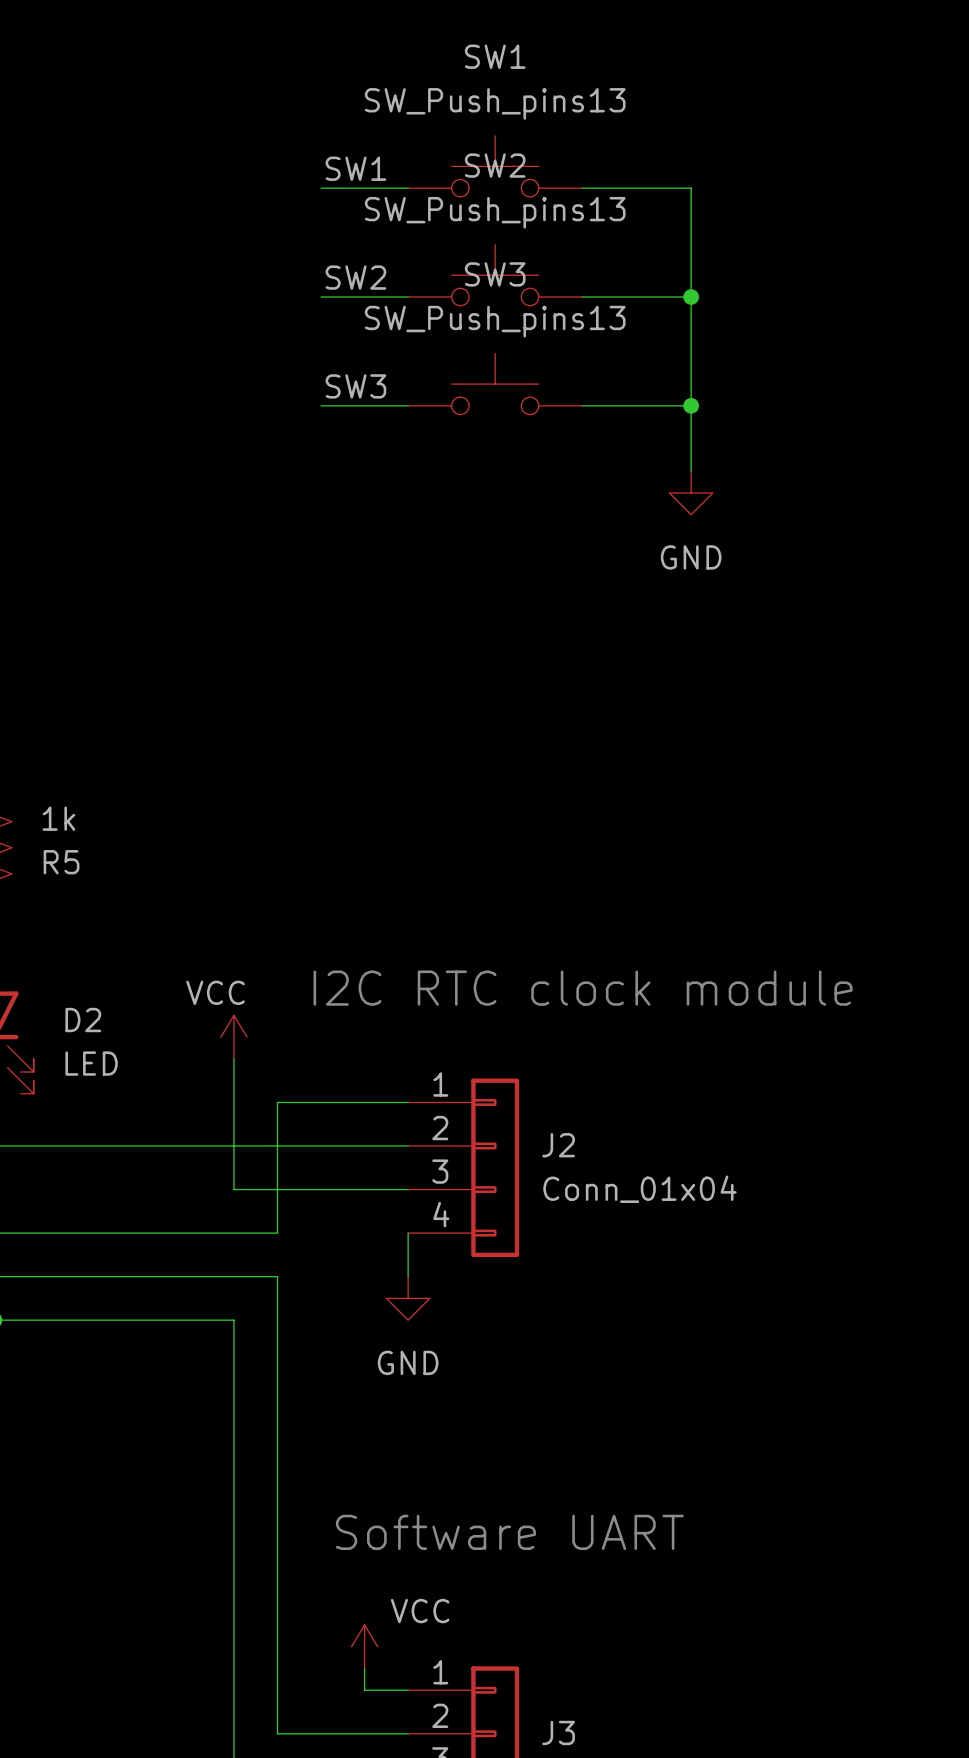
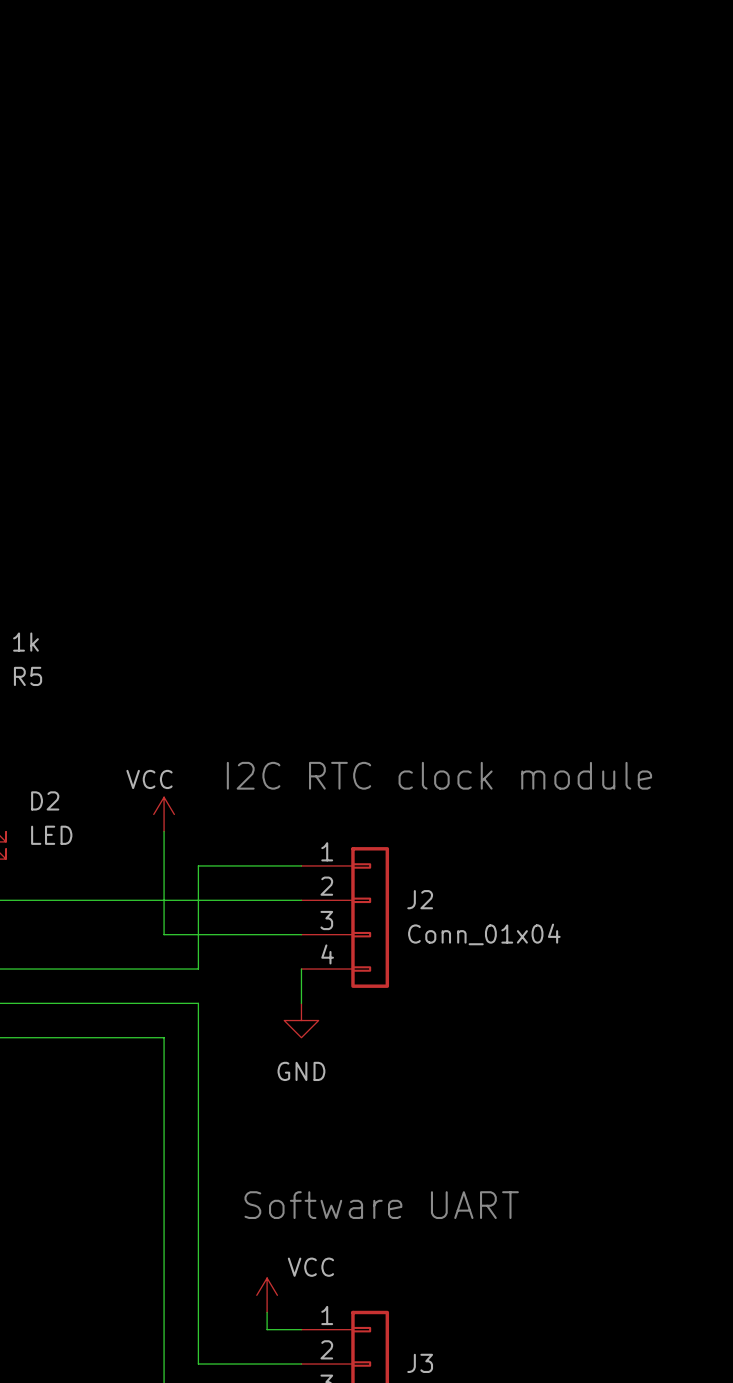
SW1: SW_Push_pins13 (495, 166) -> none
label: SW1 (355, 168) -> none
wire: (321, 188) (408, 188) -> none
wire: (582, 188) (691, 188) (691, 471) -> none
SW2: SW_Push_pins13 (495, 275) -> none
label: SW2 (355, 277) -> none
wire: (321, 297) (408, 297) -> none
wire: (582, 297) (691, 297) -> none
junction: (691, 297) -> none
SW3: SW_Push_pins13 (495, 384) -> none
label: SW3 (355, 386) -> none
wire: (321, 405) (408, 405) -> none
wire: (582, 405) (691, 405) -> none
junction: (691, 405) -> none
power symbol: GND (691, 492) -> none

